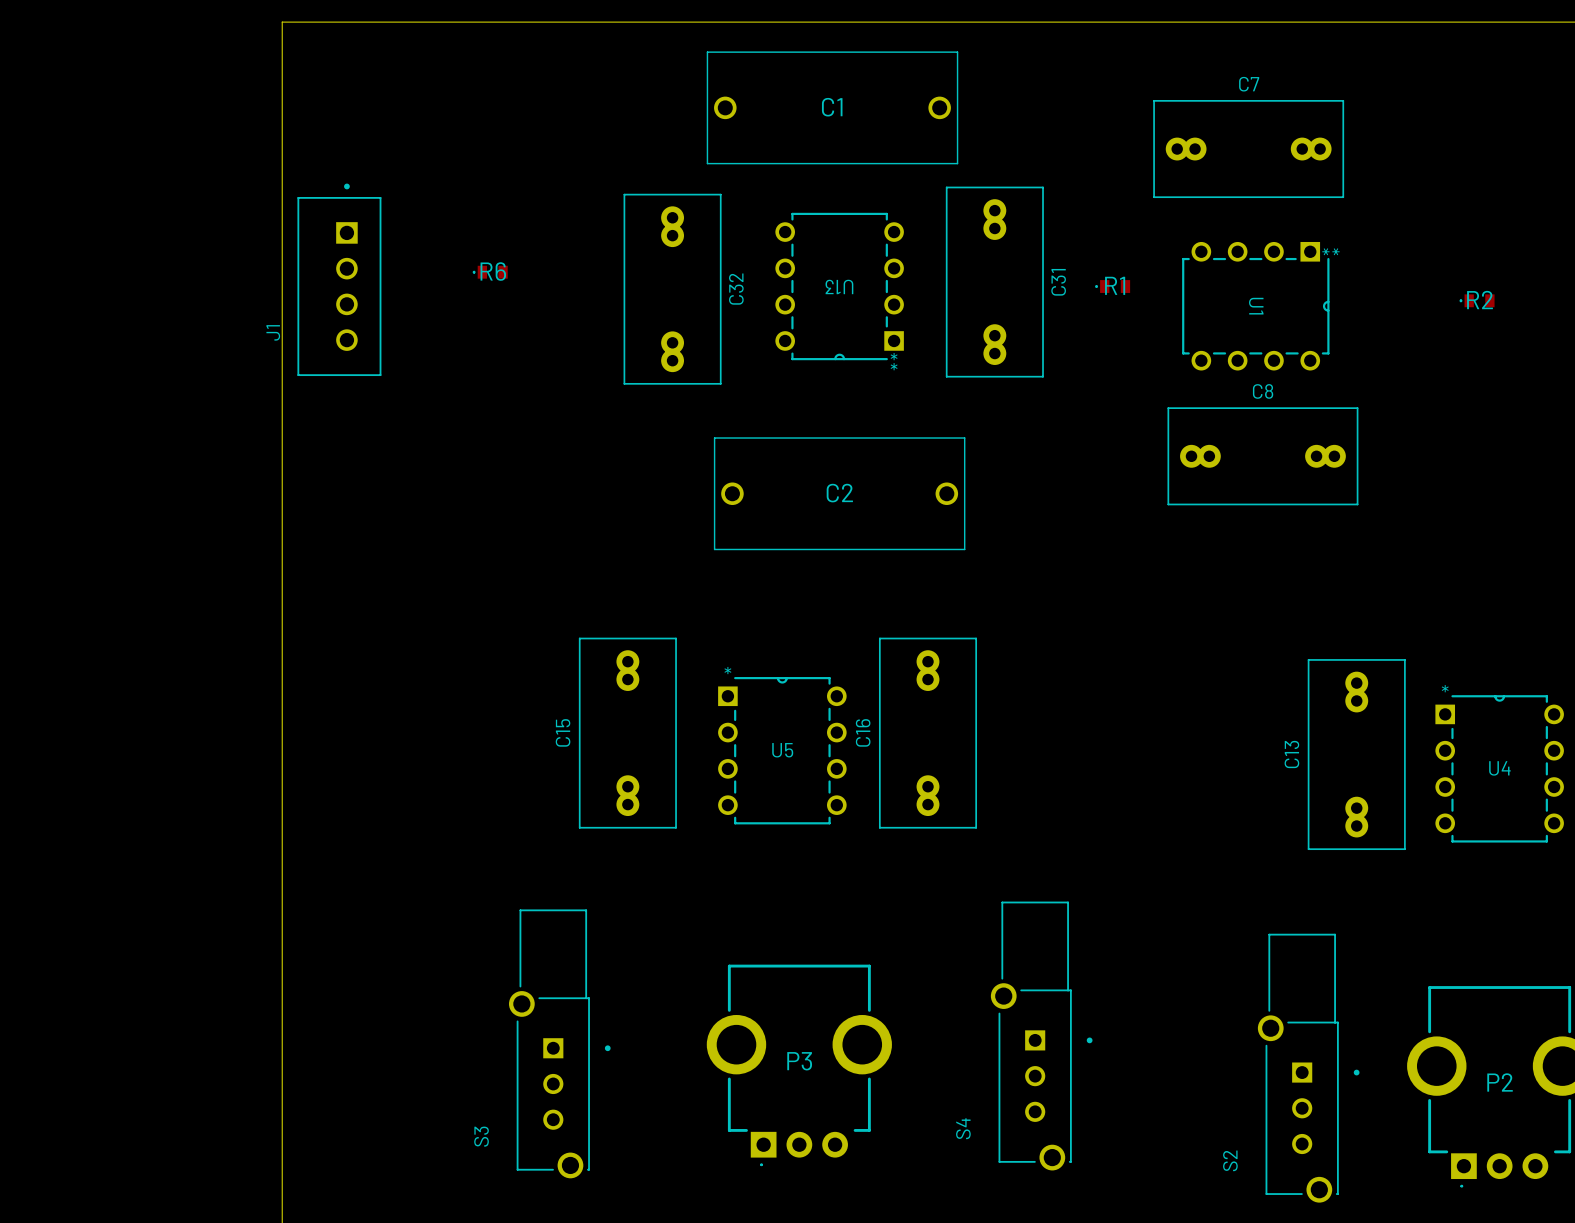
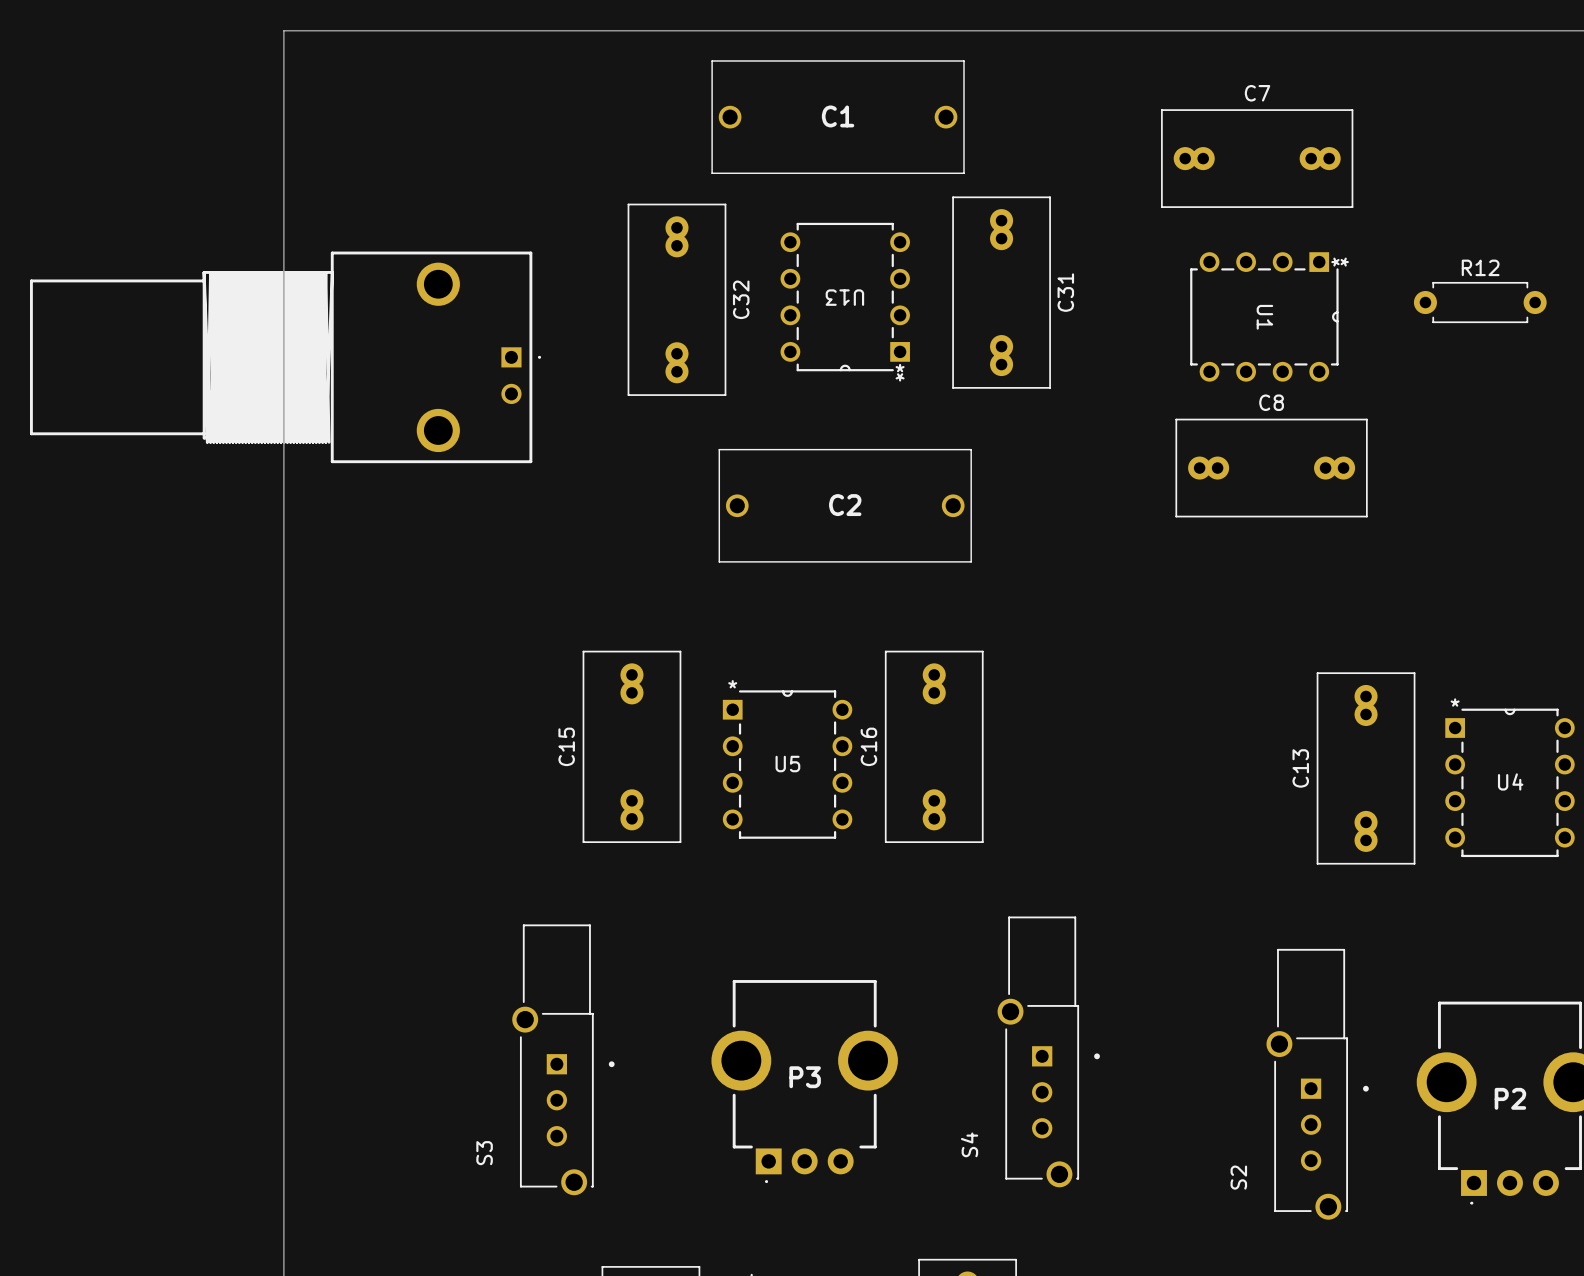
R6: (490, 272) -> none
J1: (339, 279) -> none
R1: (1112, 286) -> none
R12: none -> (1480, 302)
R2: (1477, 300) -> none
part: none -> (285, 357)

